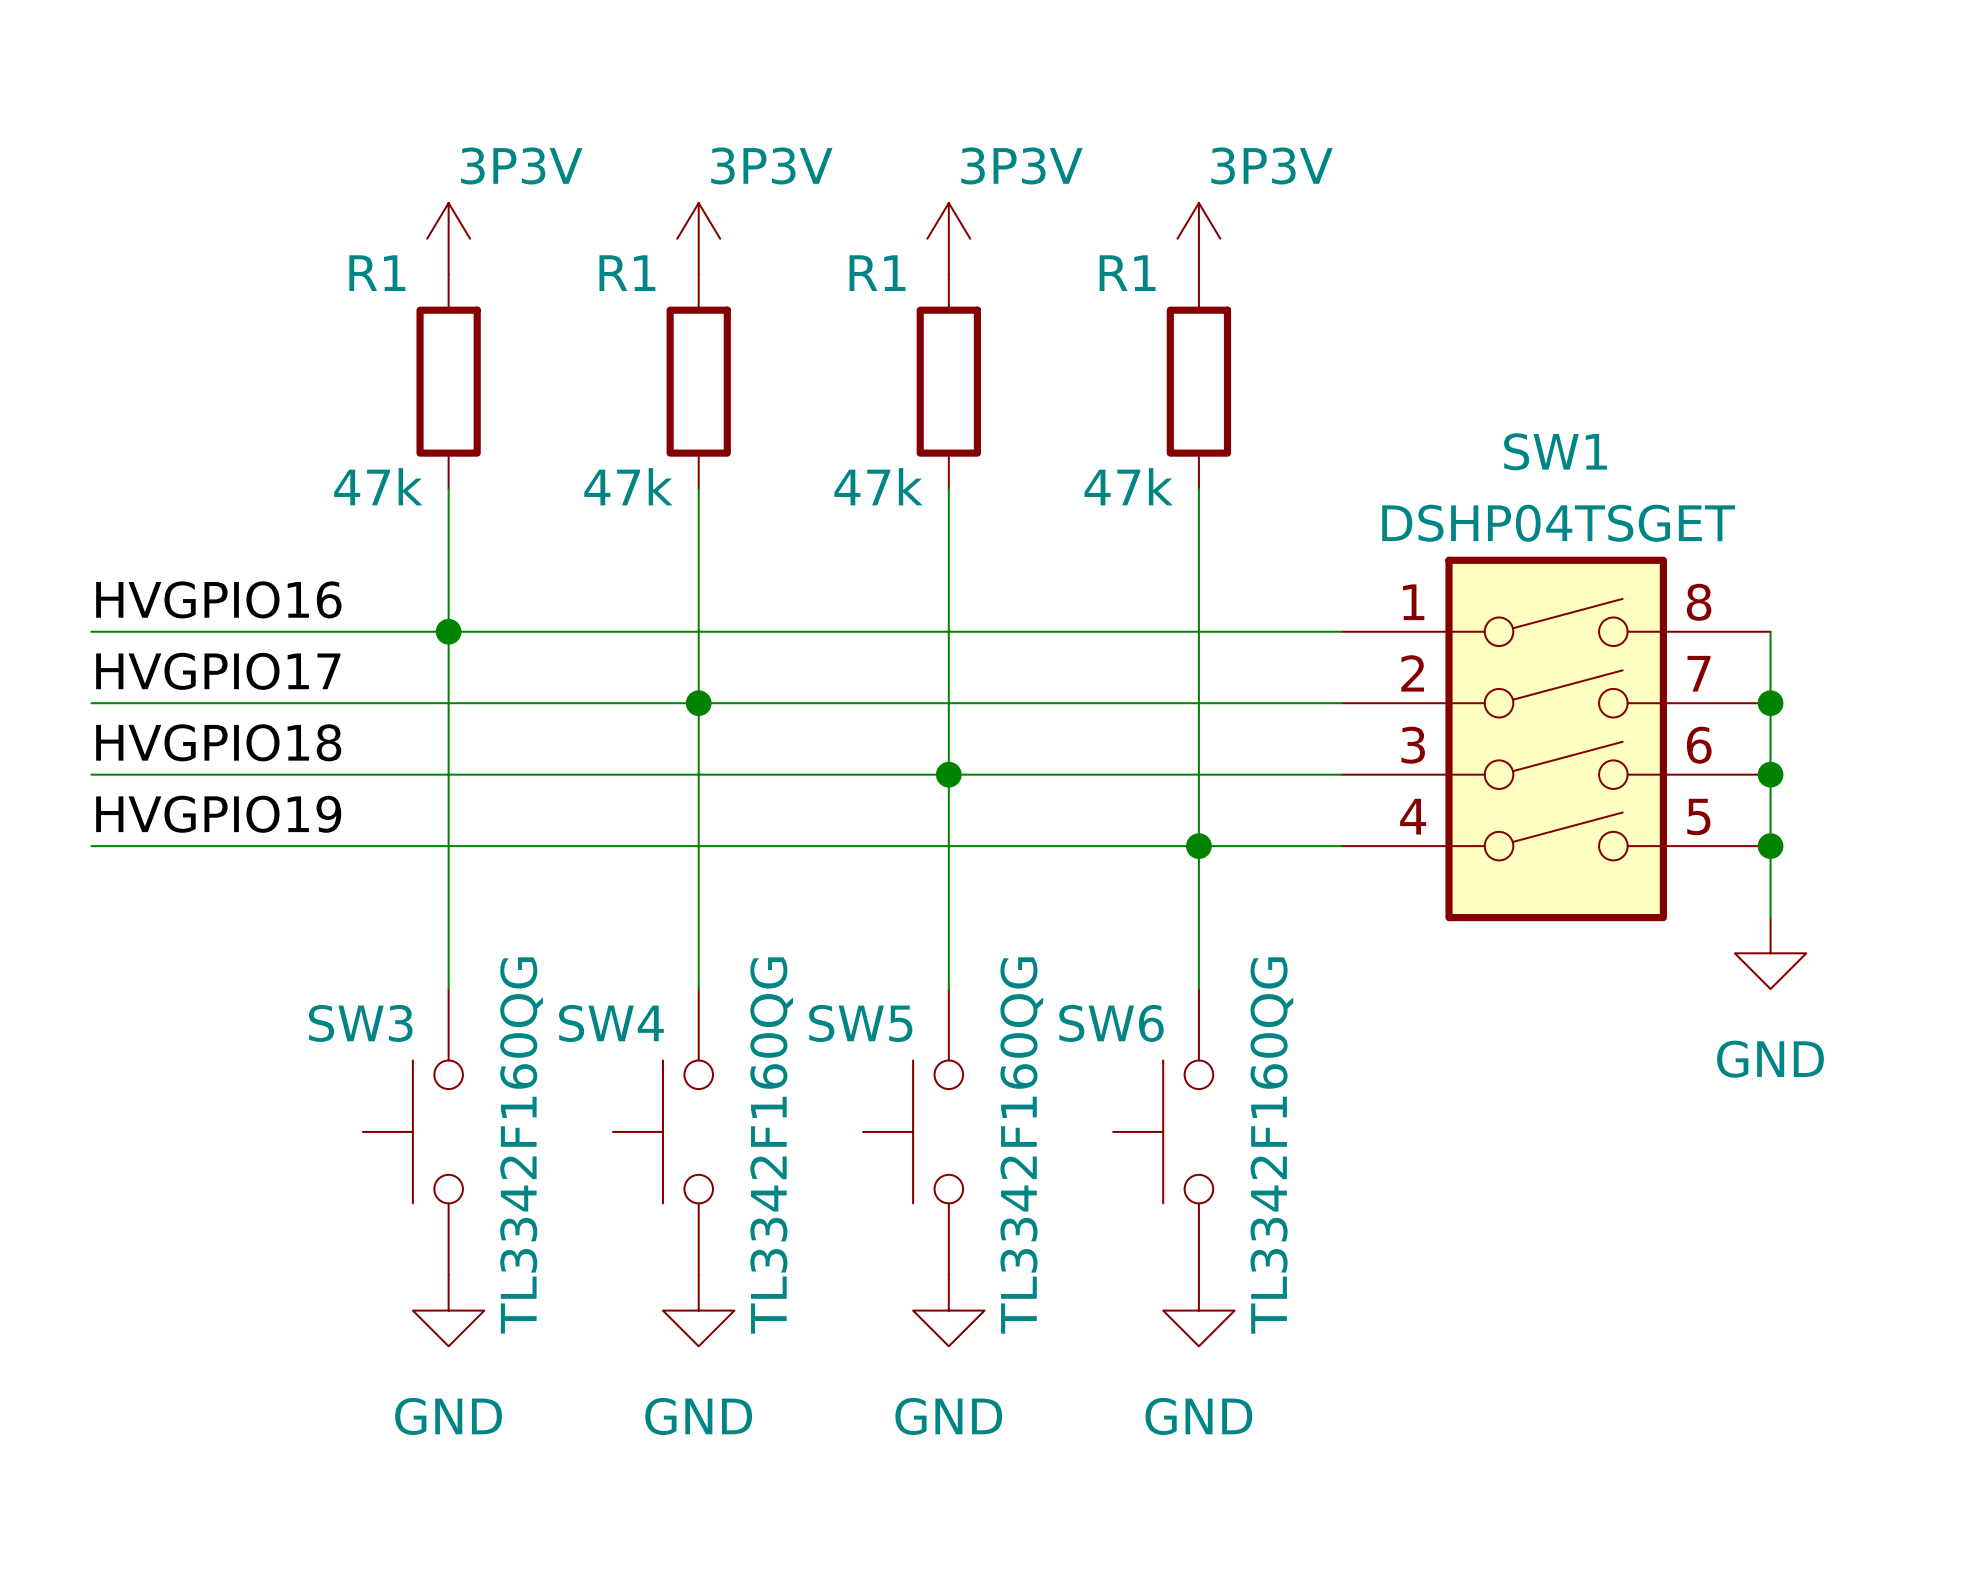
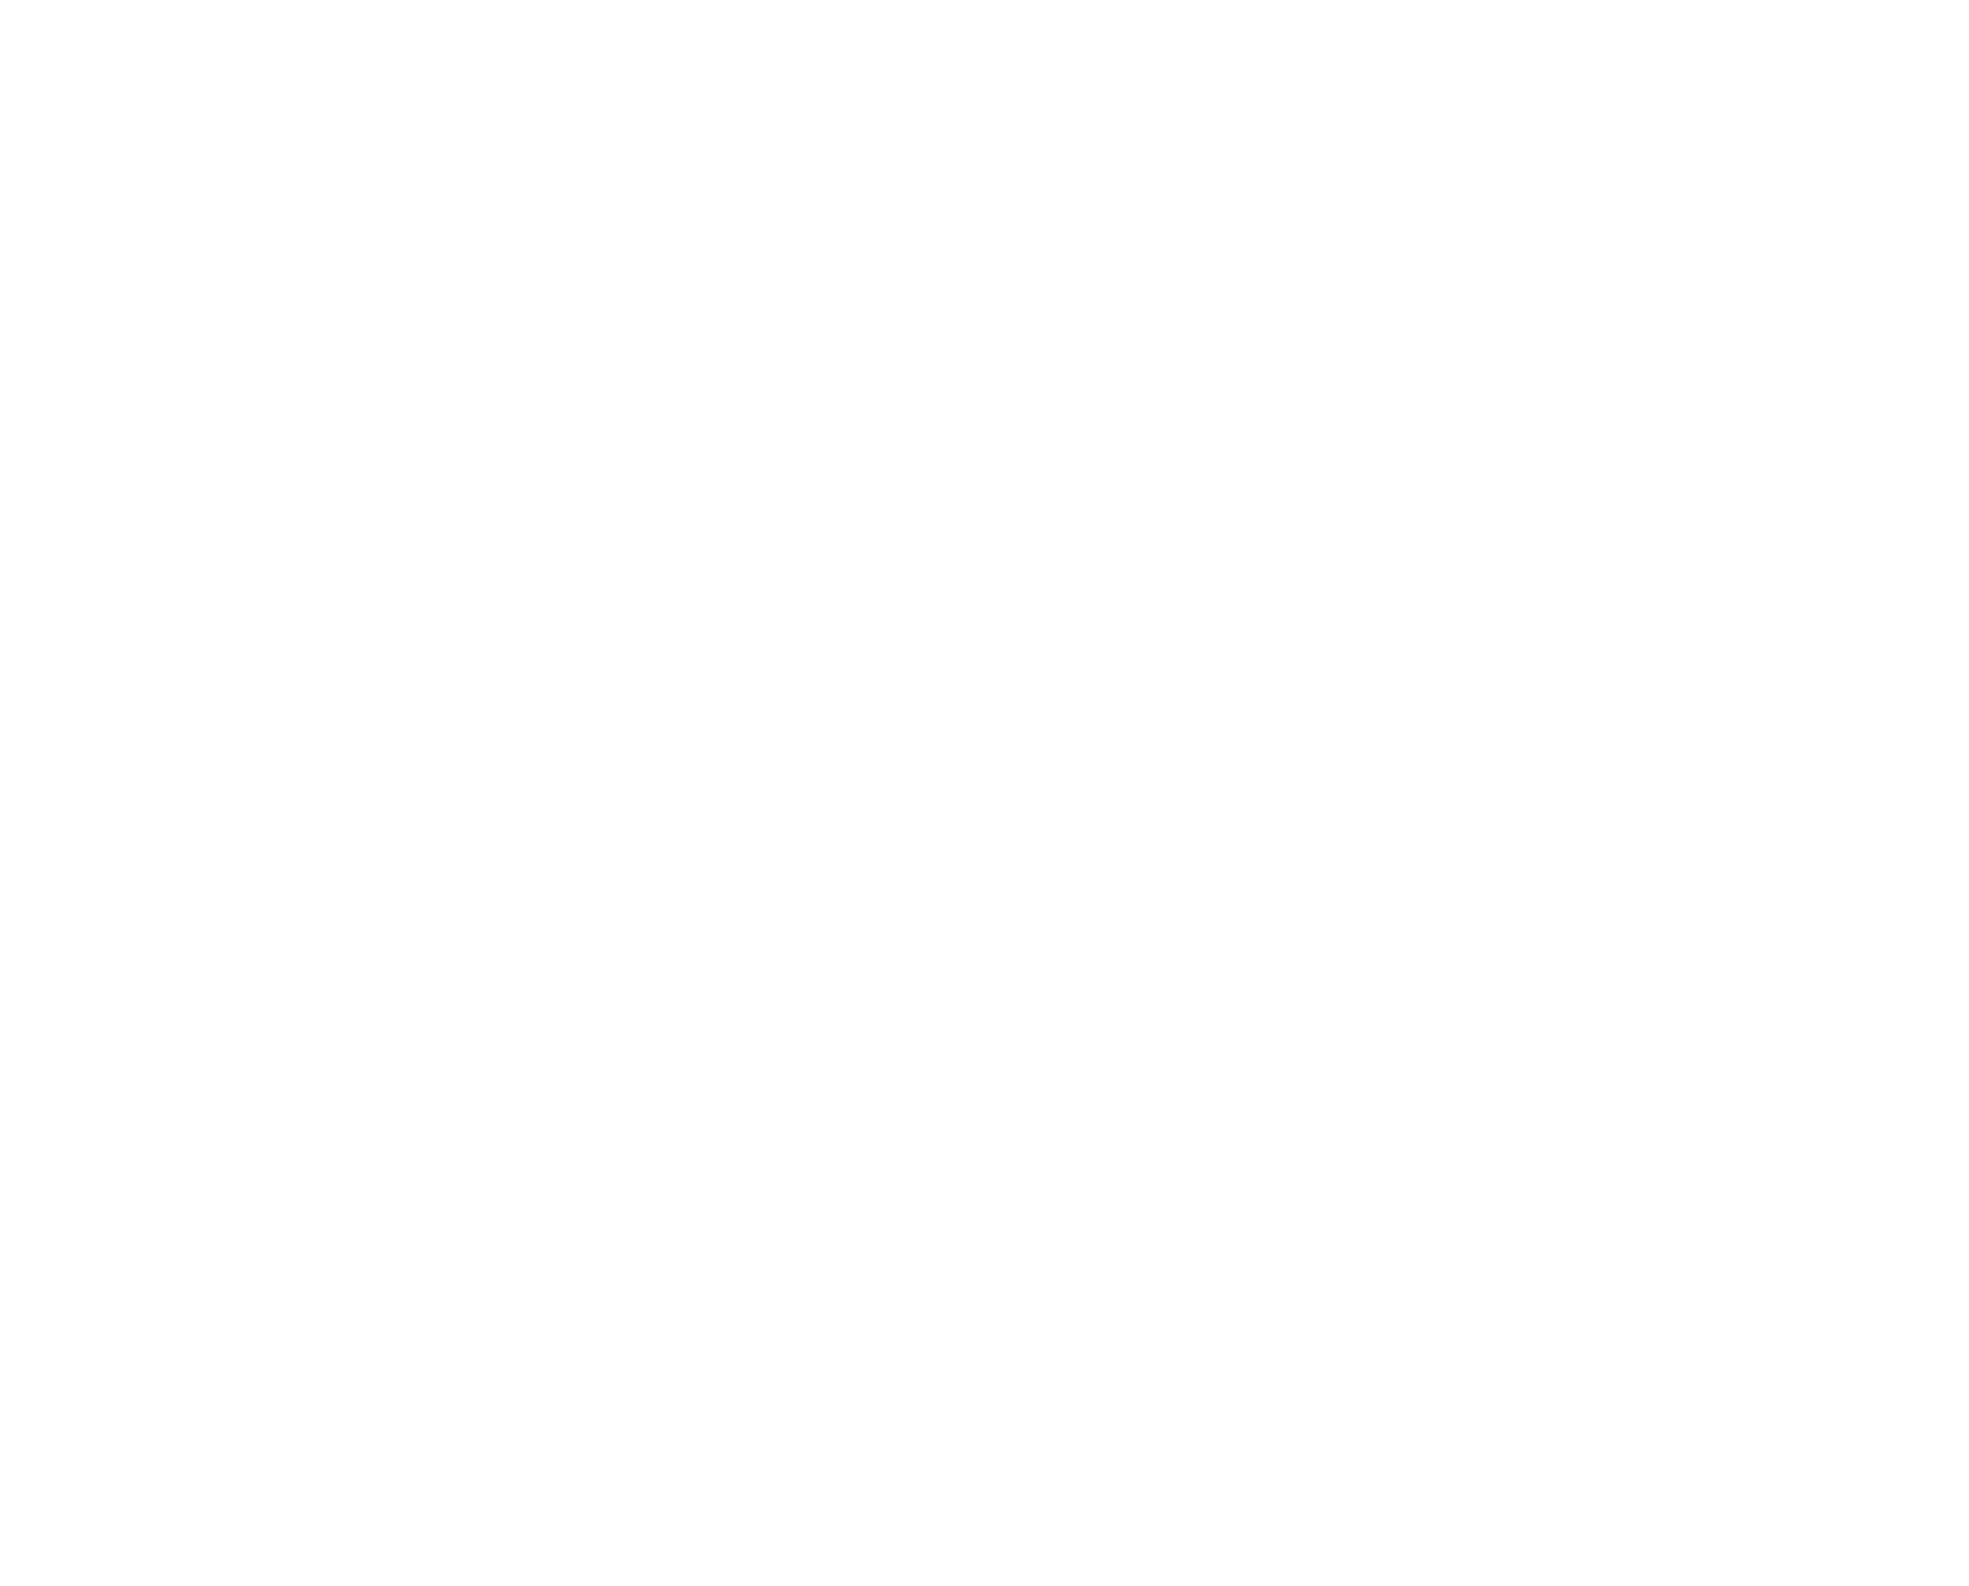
power symbol: 3P3V (448, 238) -> none
power symbol: 3P3V (698, 238) -> none
power symbol: 3P3V (948, 238) -> none
power symbol: 3P3V (1198, 238) -> none
R1: 47k (448, 381) -> none
R1: 47k (698, 381) -> none
R1: 47k (948, 381) -> none
R1: 47k (1198, 381) -> none
wire: (448, 488) (448, 989) -> none
wire: (698, 488) (698, 989) -> none
wire: (948, 488) (948, 989) -> none
wire: (1198, 488) (1198, 989) -> none
label: HVGPIO16 (218, 599) -> none
wire: (91, 631) (1341, 631) -> none
junction: (448, 631) -> none
wire: (1770, 631) (1770, 917) -> none
label: HVGPIO17 (218, 671) -> none
wire: (91, 703) (1341, 703) -> none
junction: (698, 703) -> none
junction: (1770, 703) -> none
SW1: DSHP04TSGET (1556, 738) -> none
label: HVGPIO18 (218, 742) -> none
wire: (91, 774) (1341, 774) -> none
junction: (948, 774) -> none
junction: (1770, 774) -> none
label: HVGPIO19 (218, 814) -> none
wire: (91, 846) (1341, 846) -> none
junction: (1198, 846) -> none
junction: (1770, 846) -> none
power symbol: GND (1770, 953) -> none
SW3: TL3342F160QG (412, 1131) -> none
SW4: TL3342F160QG (662, 1131) -> none
SW5: TL3342F160QG (913, 1131) -> none
SW6: TL3342F160QG (1163, 1131) -> none
power symbol: GND (448, 1310) -> none
power symbol: GND (698, 1310) -> none
power symbol: GND (948, 1310) -> none
power symbol: GND (1198, 1310) -> none

